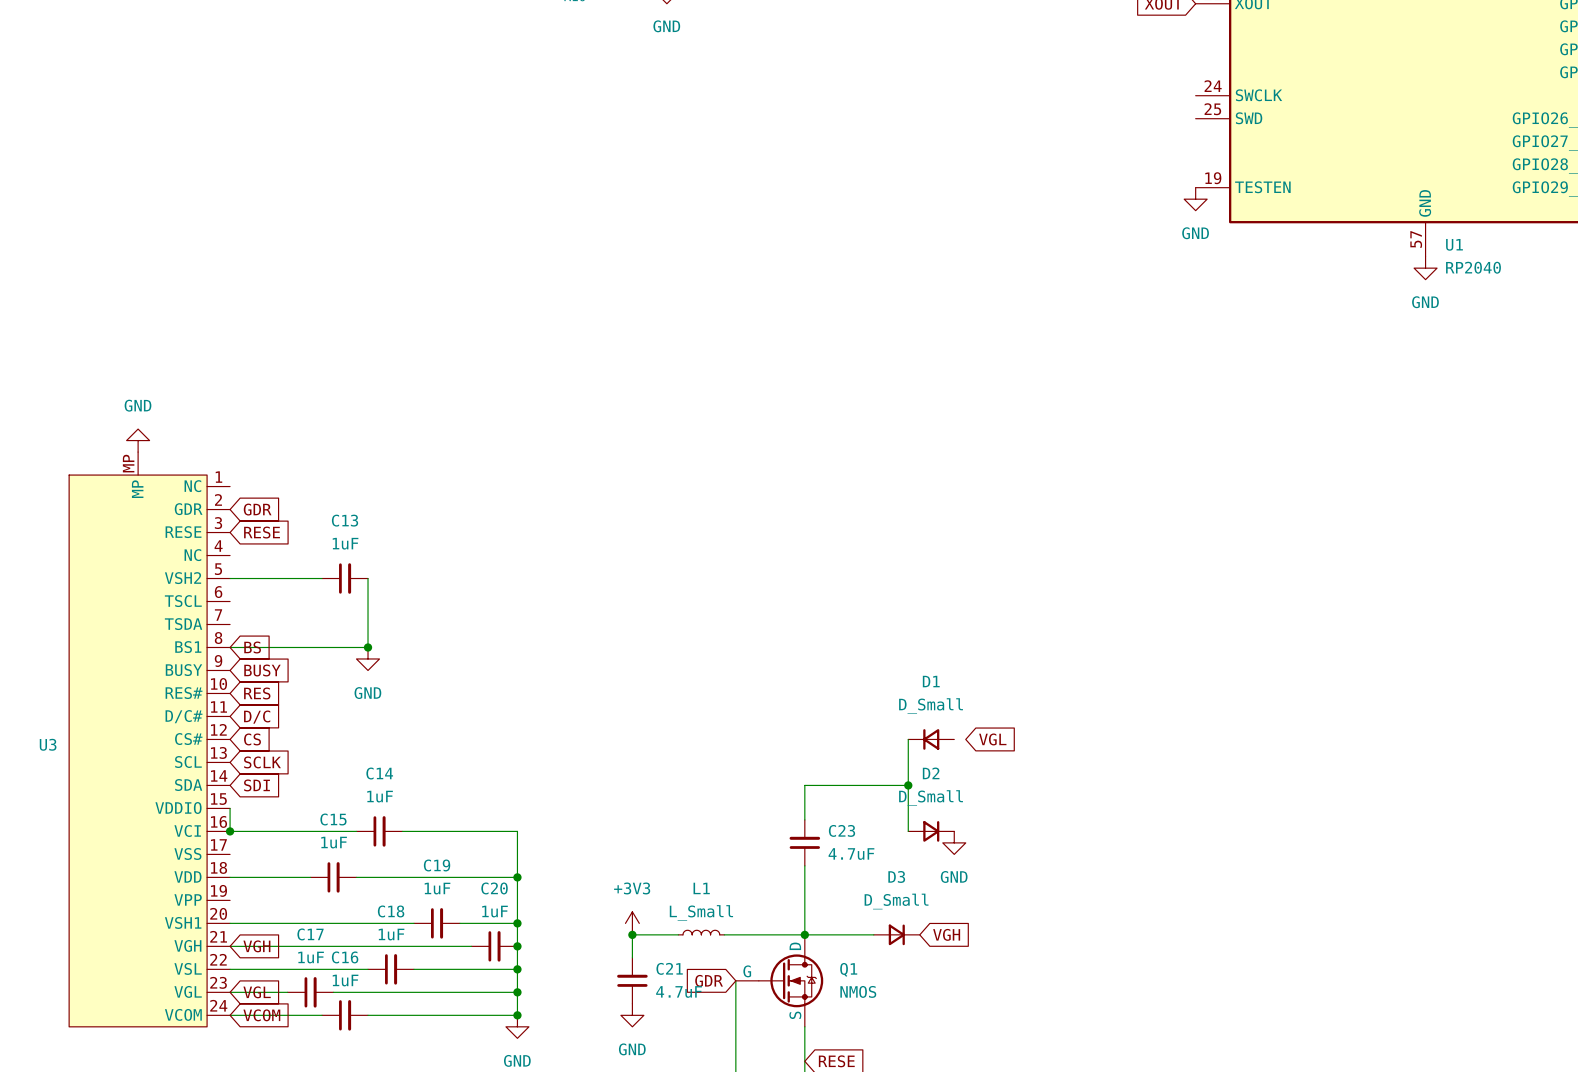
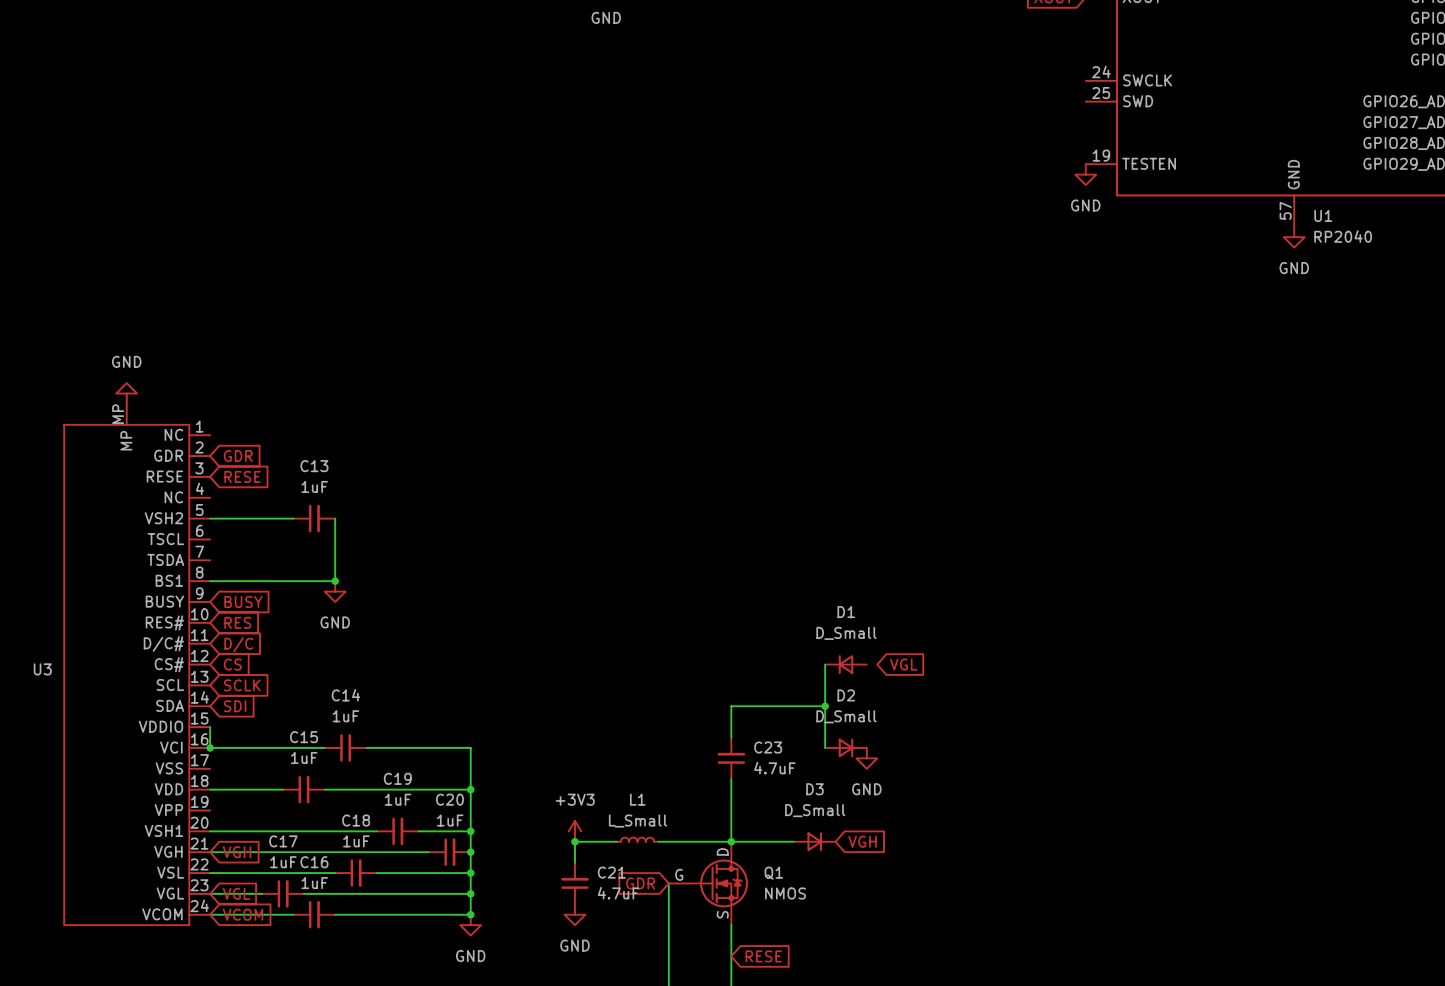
global label: BS (252, 647) -> none

